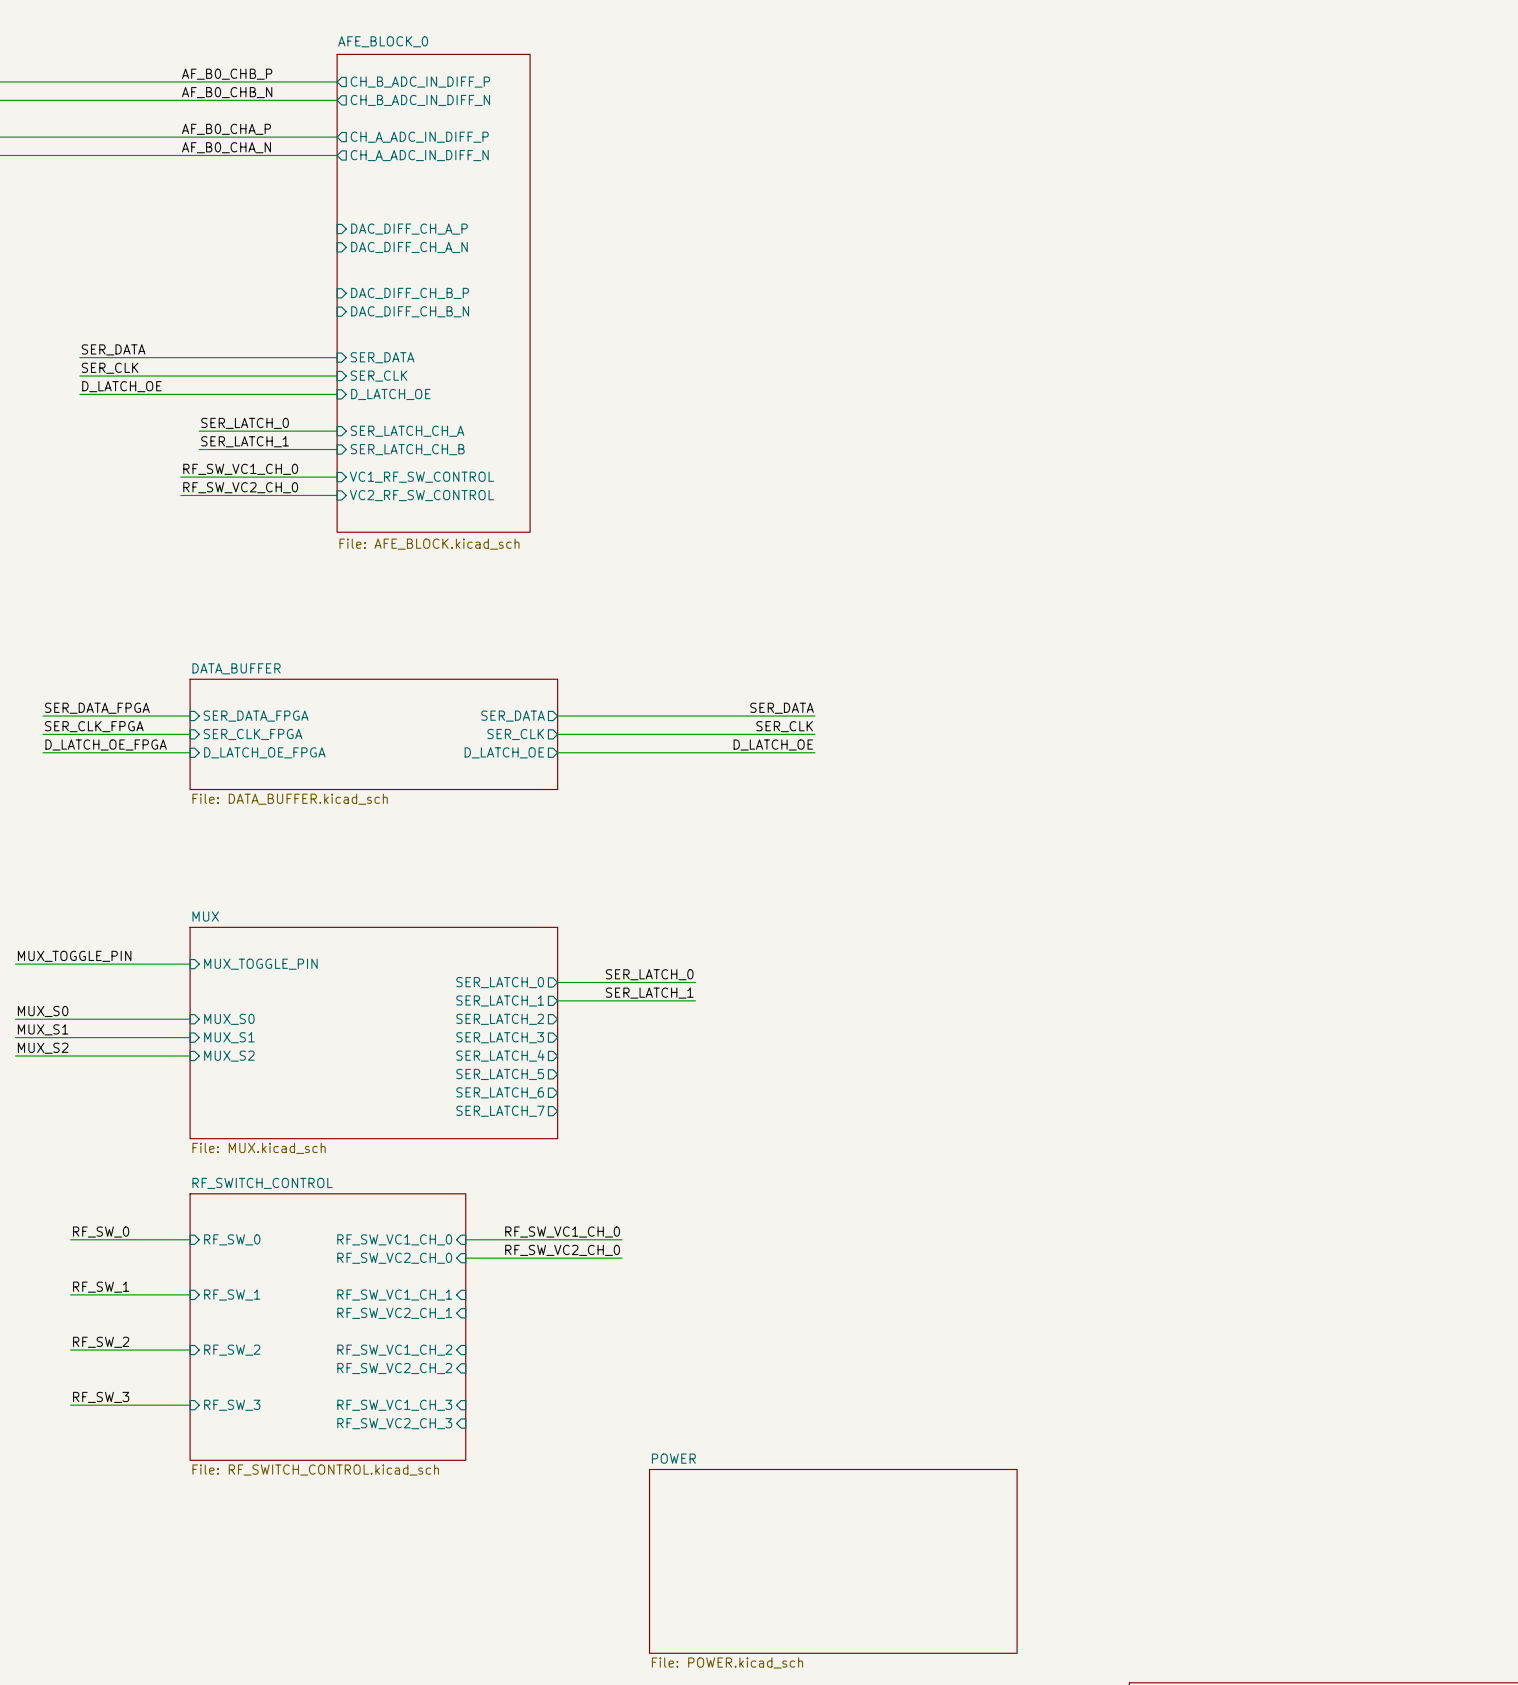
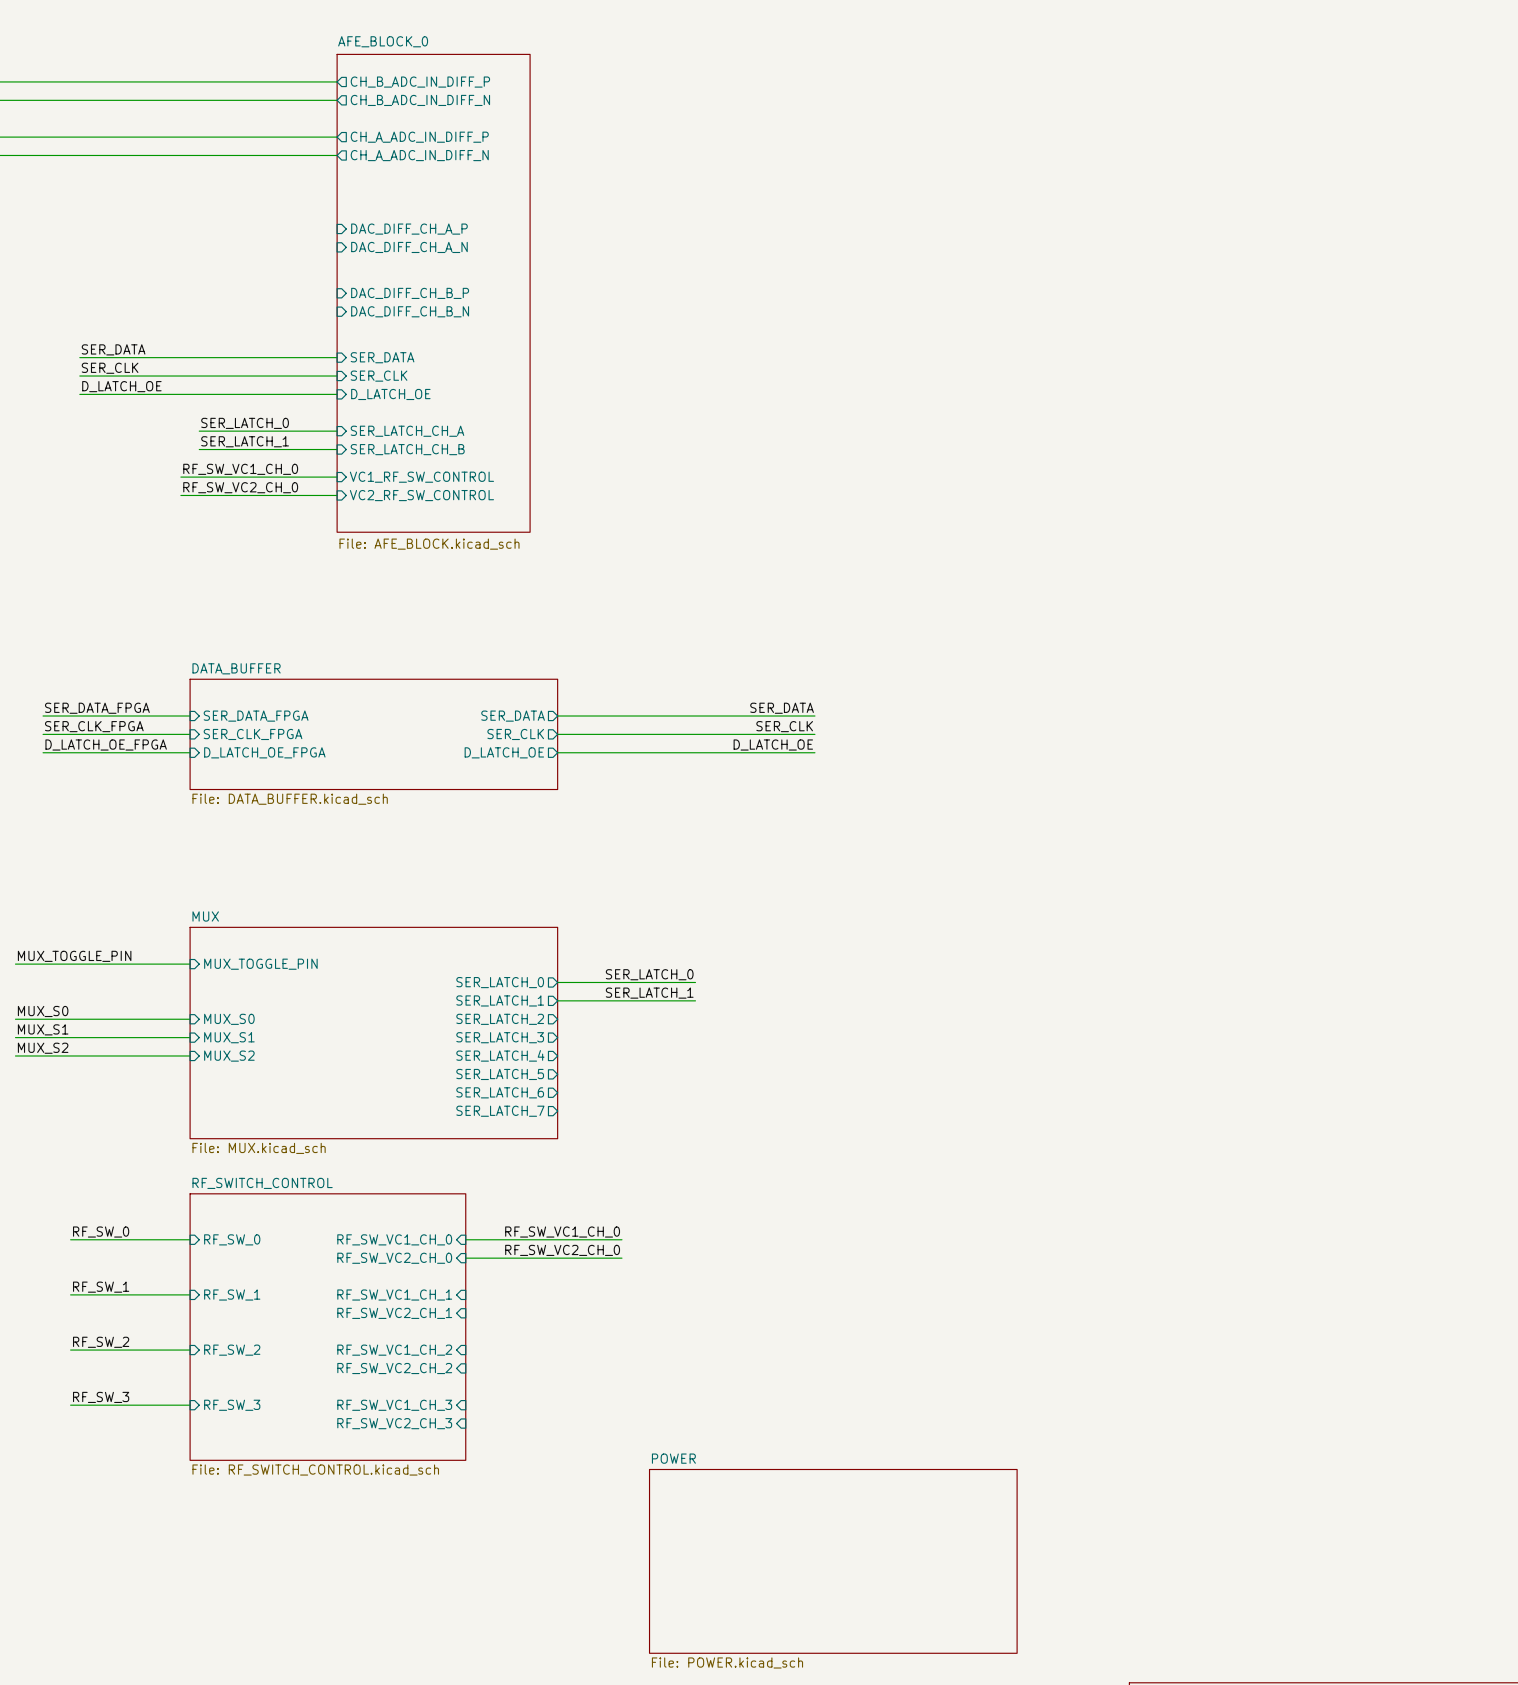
label: AF_B0_CHB_P (227, 74) -> none
label: AF_B0_CHB_N (227, 92) -> none
label: AF_B0_CHA_P (226, 129) -> none
label: AF_B0_CHA_N (226, 147) -> none

